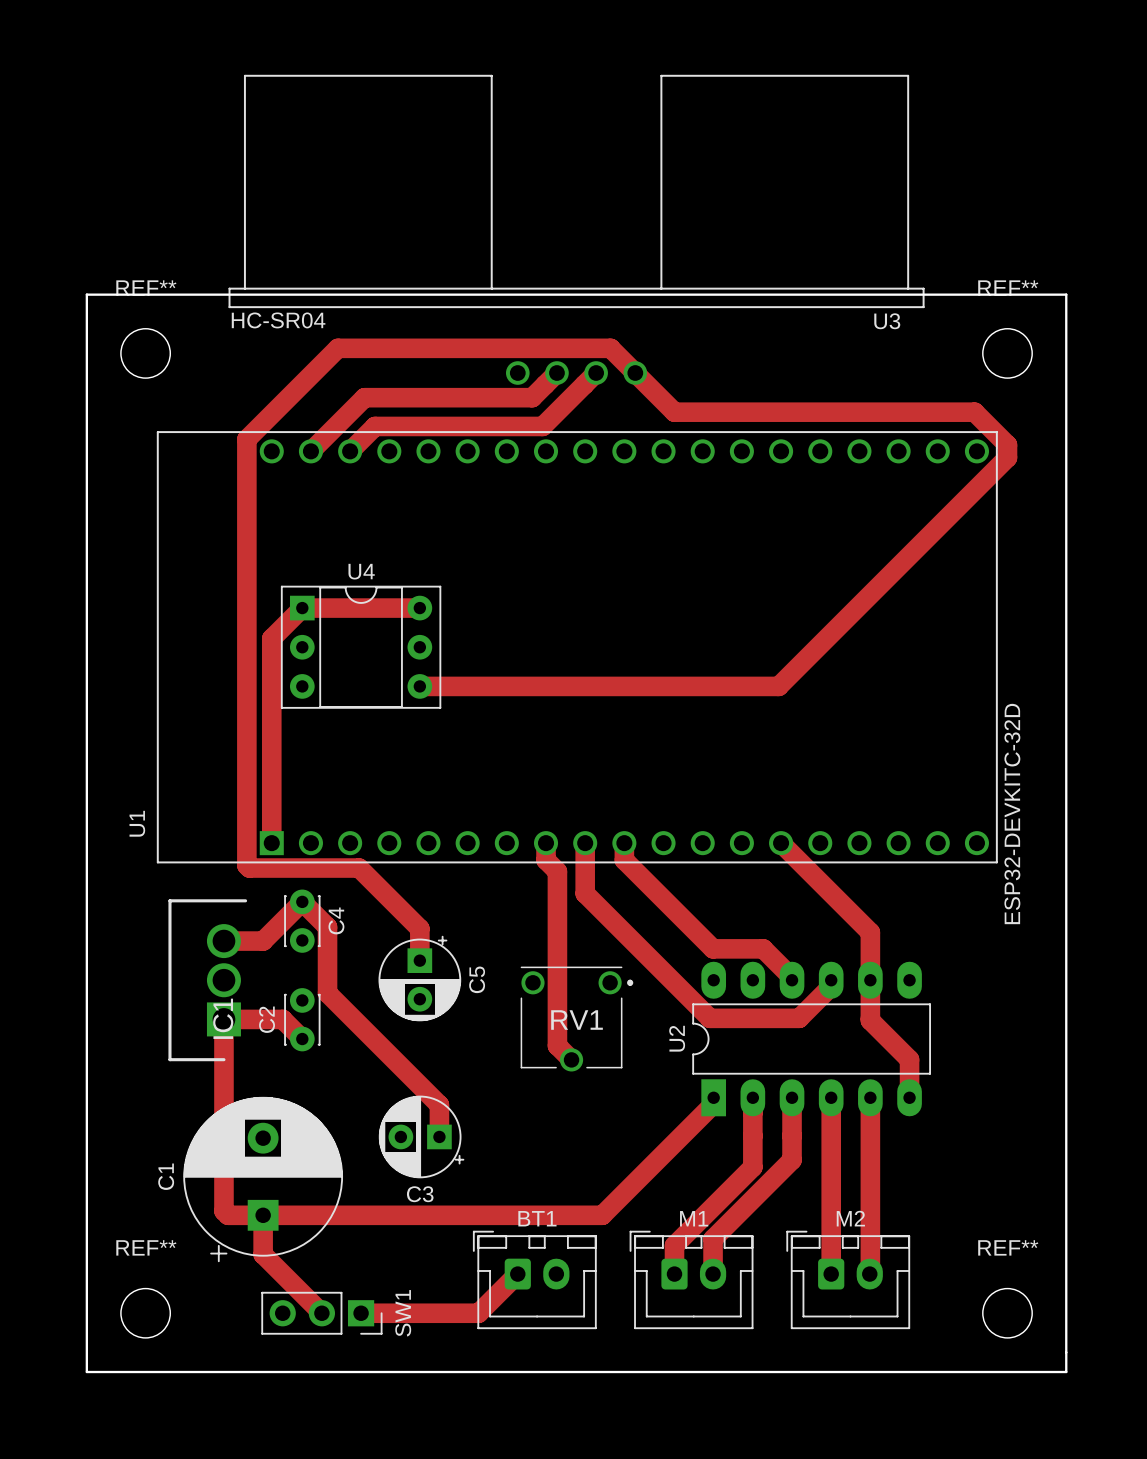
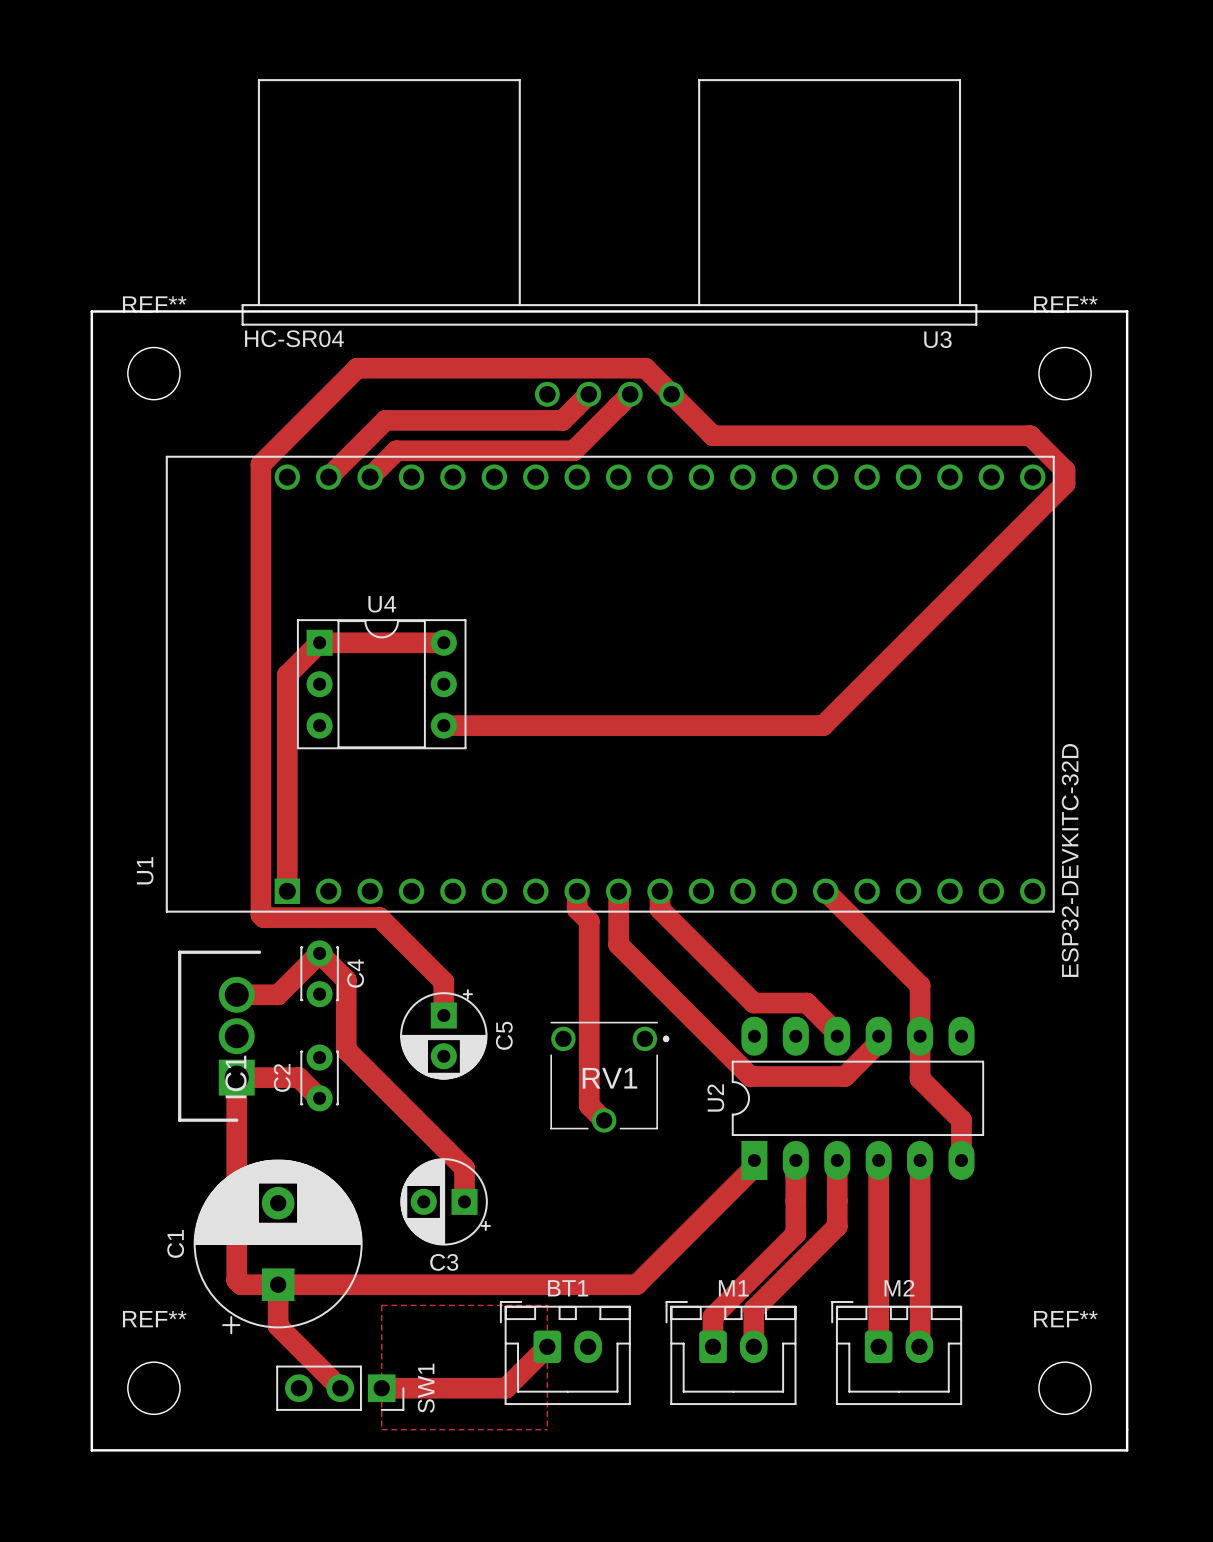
zone outline: none -> (381, 1305) (381, 1429) (547, 1429) (547, 1305) (381, 1305)

